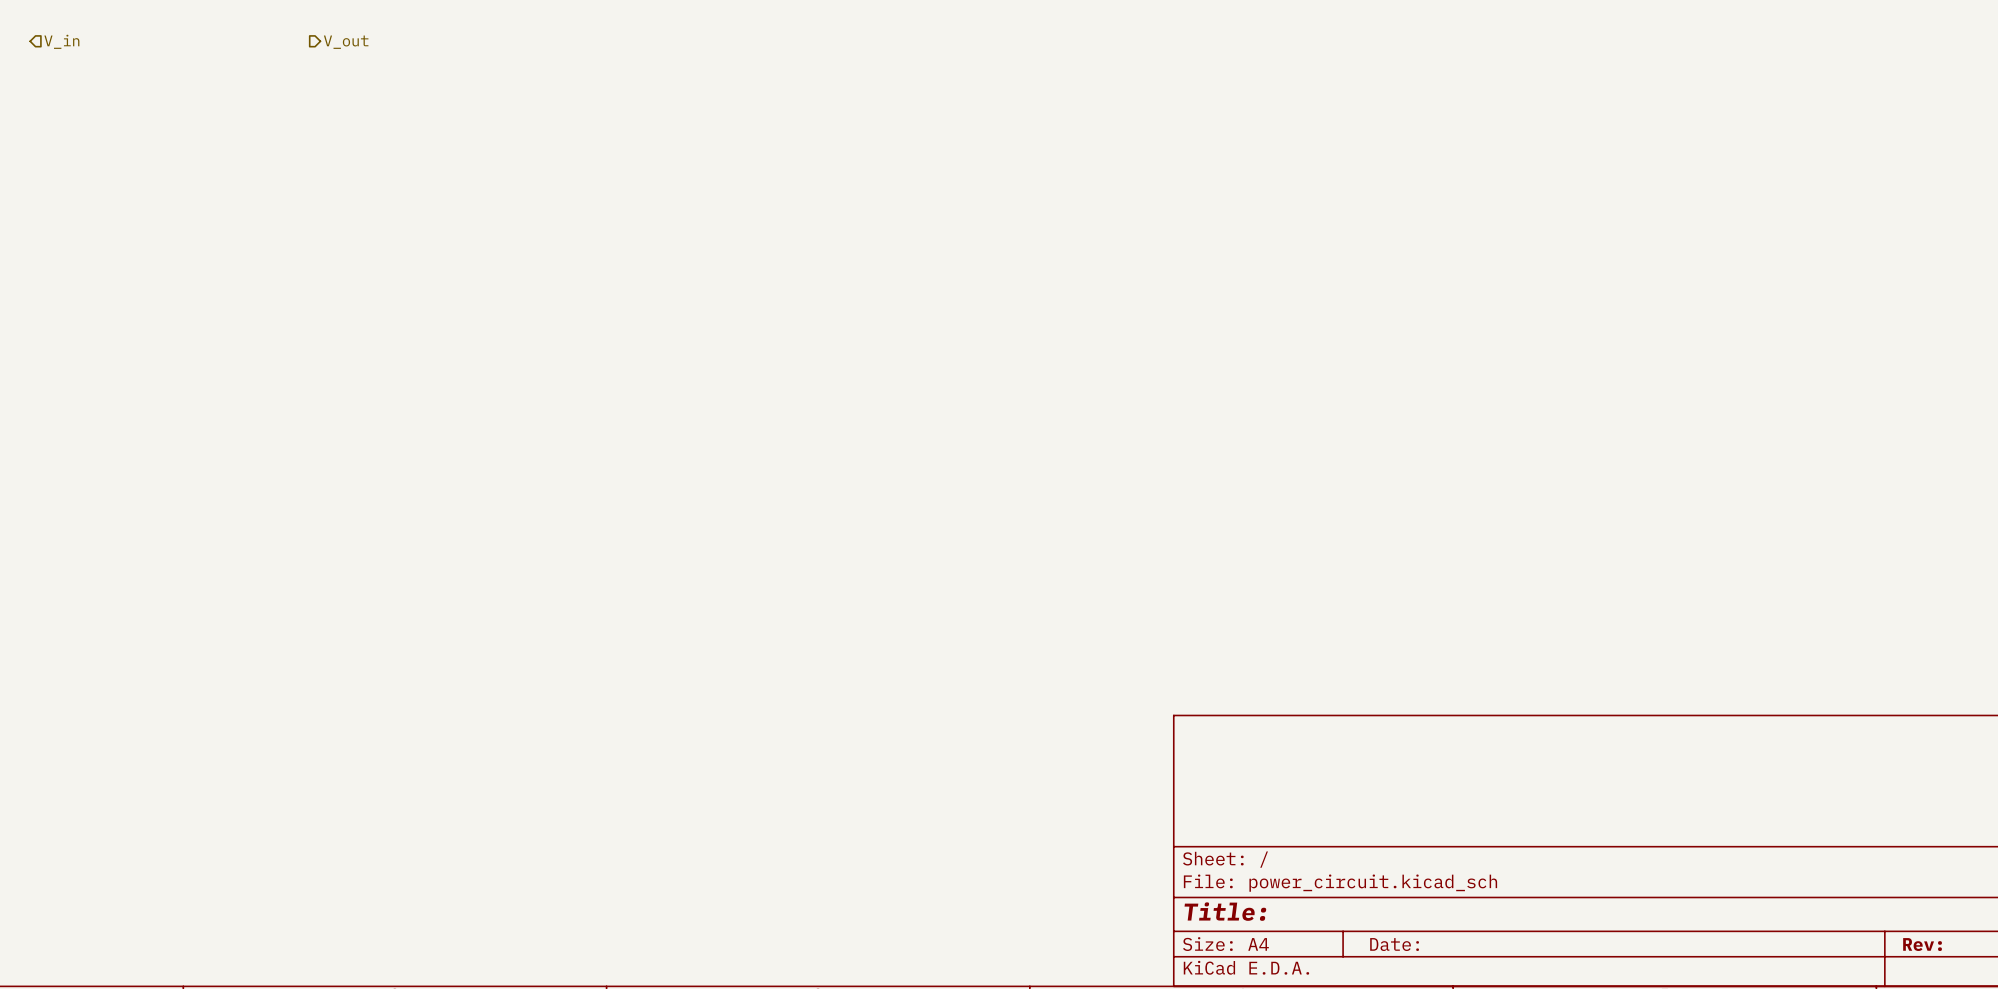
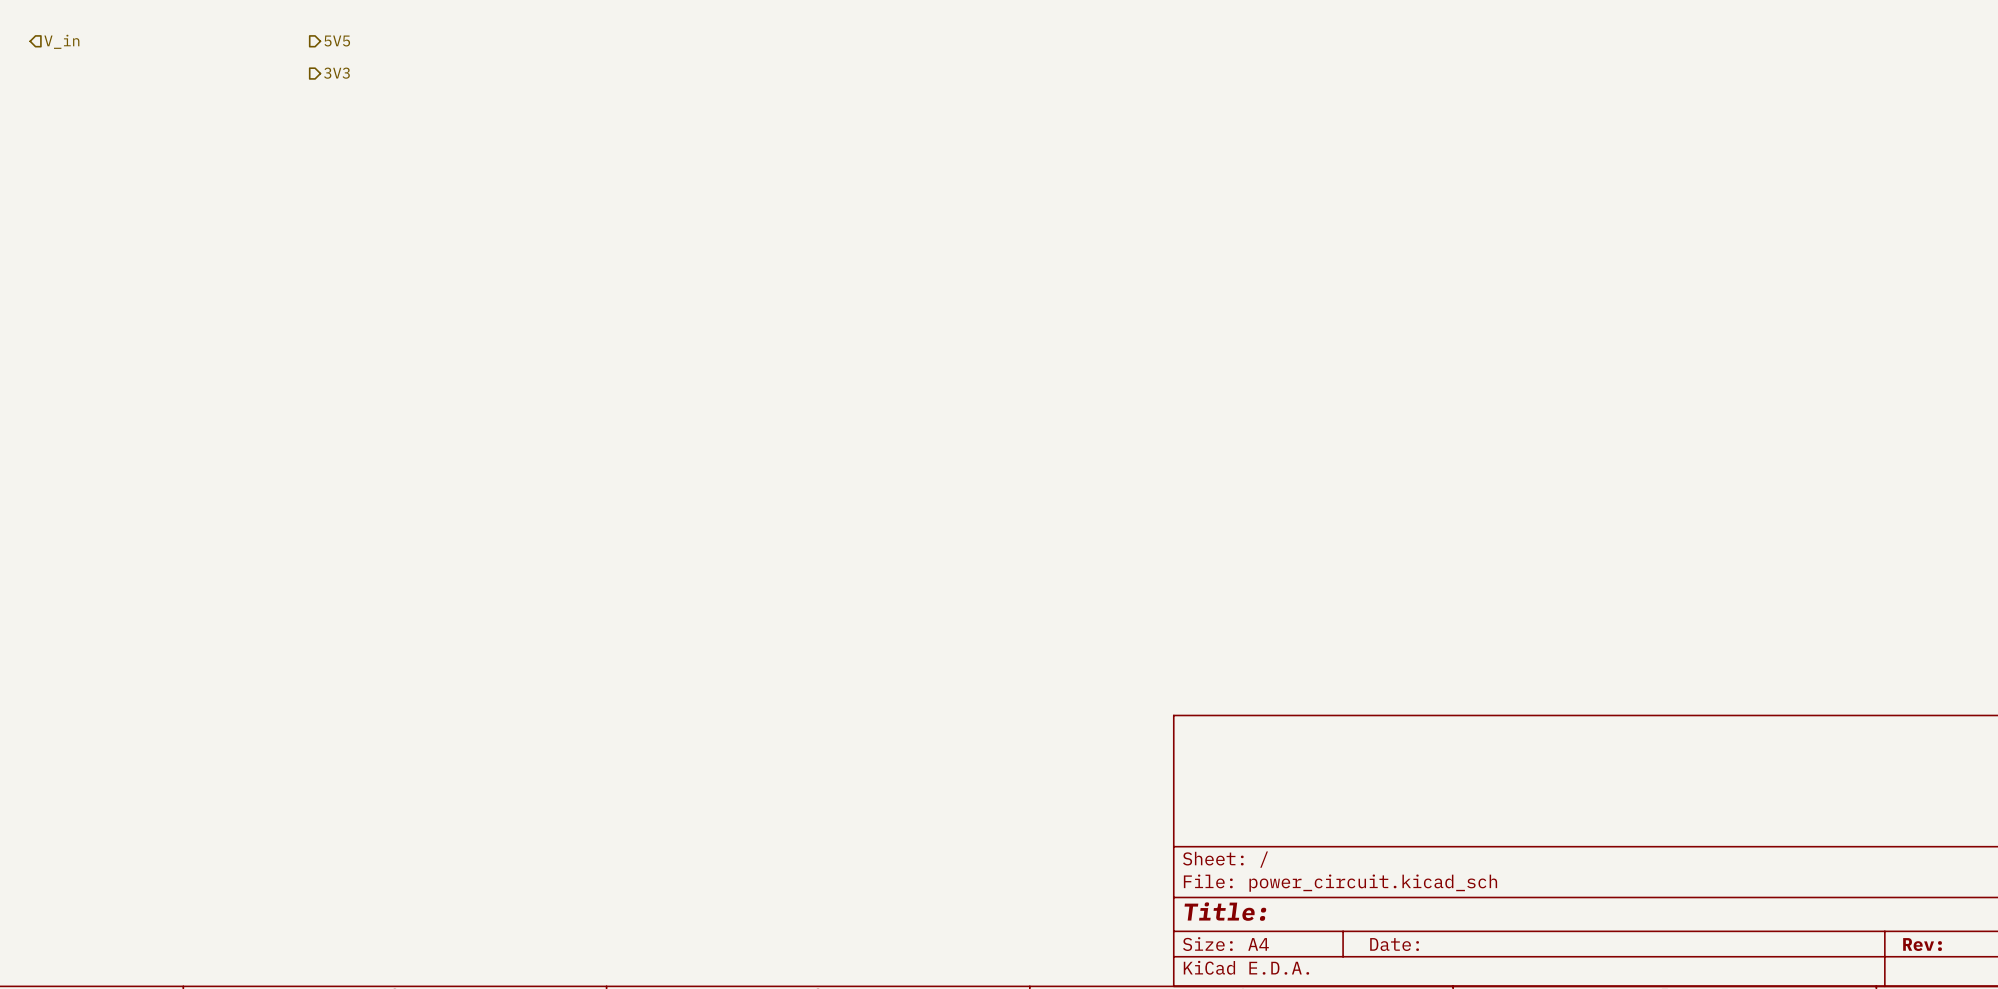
hierarchical label: V_out (346, 42) -> 5V5 (337, 40)
hierarchical label: none -> 3V3 (336, 73)

